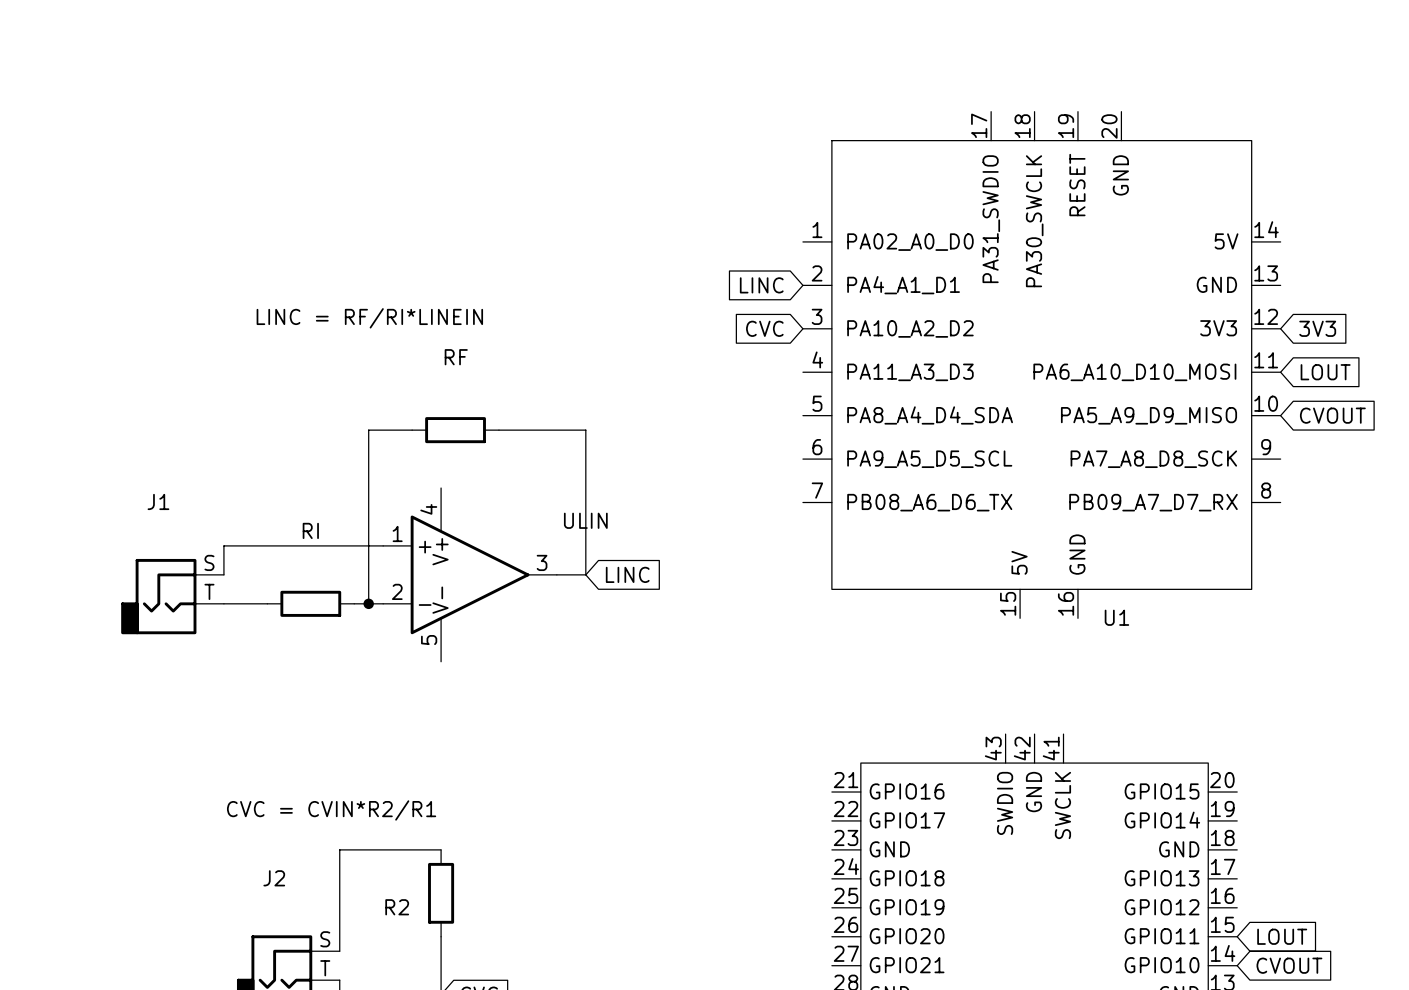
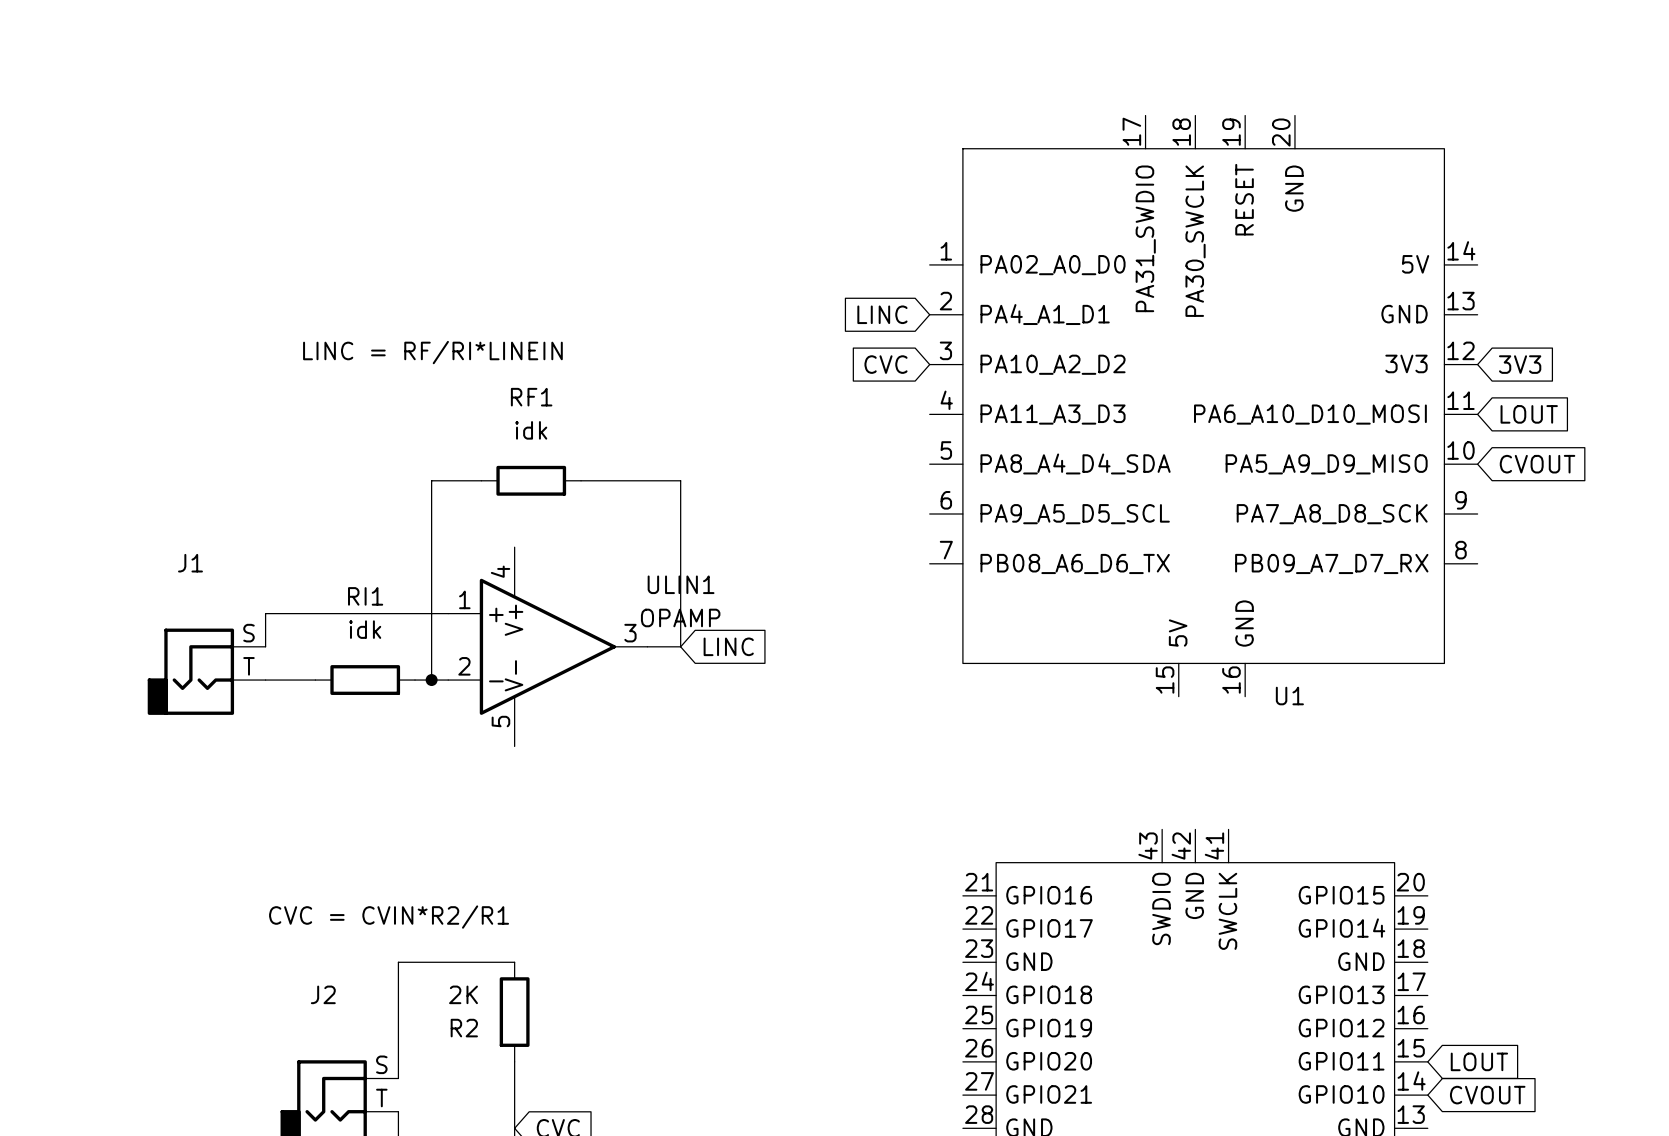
RF name: RF (456, 357) -> RF1 (531, 397)
RF value: none -> idk (531, 430)
ULIN name: ULIN (585, 520) -> ULIN1 (681, 584)
RI name: RI (310, 530) -> RI1 (365, 596)
ULIN value: none -> OPAMP (680, 617)
RI value: none -> idk (365, 629)
R2 value: none -> 2K (463, 994)

